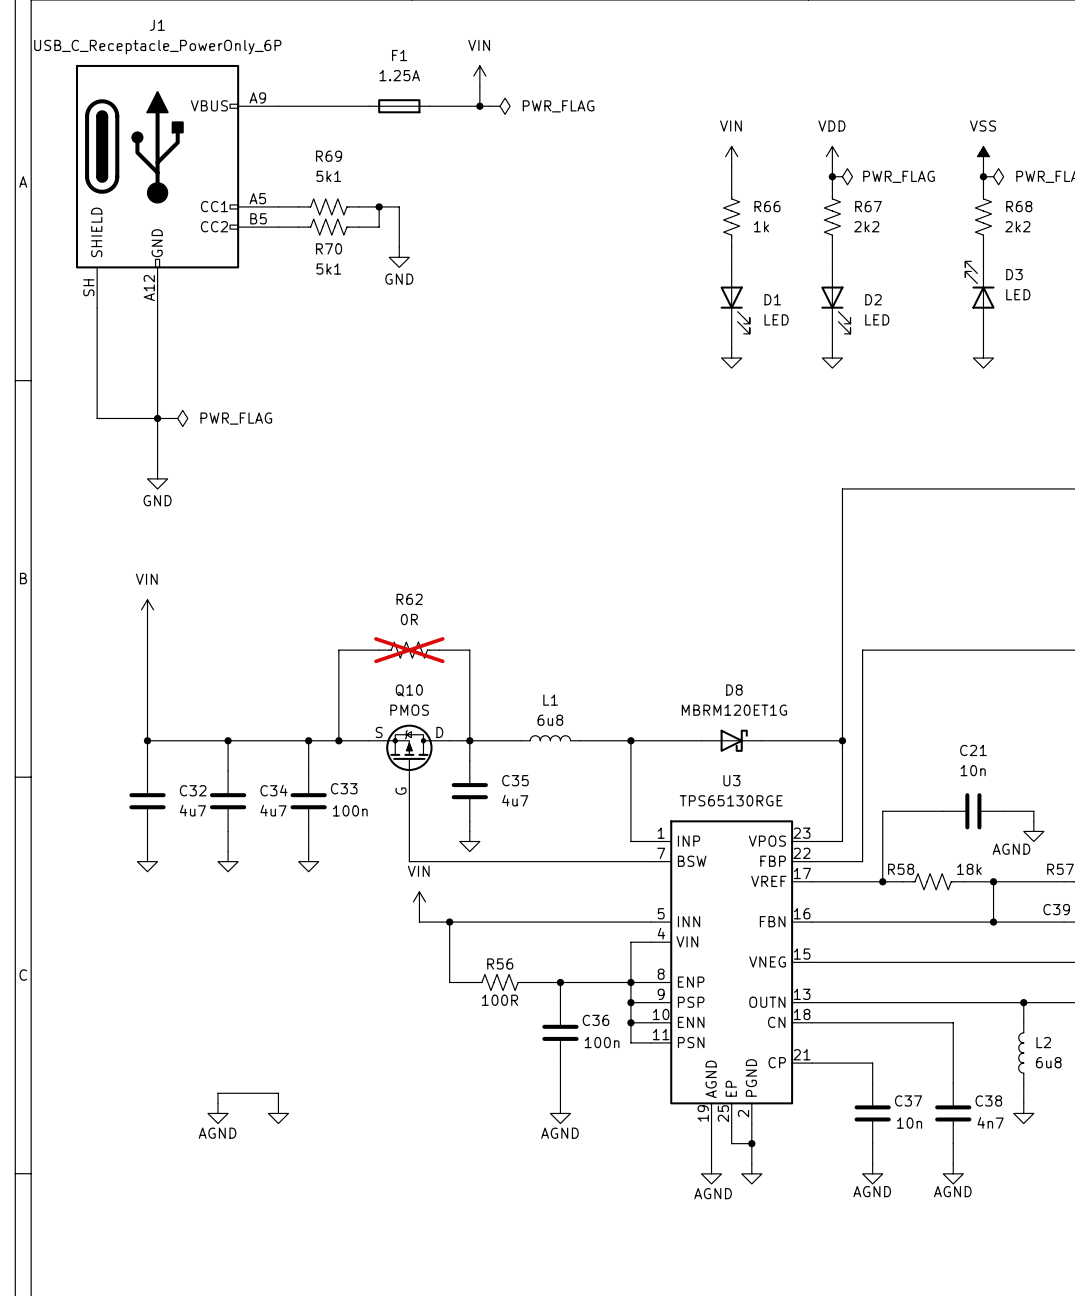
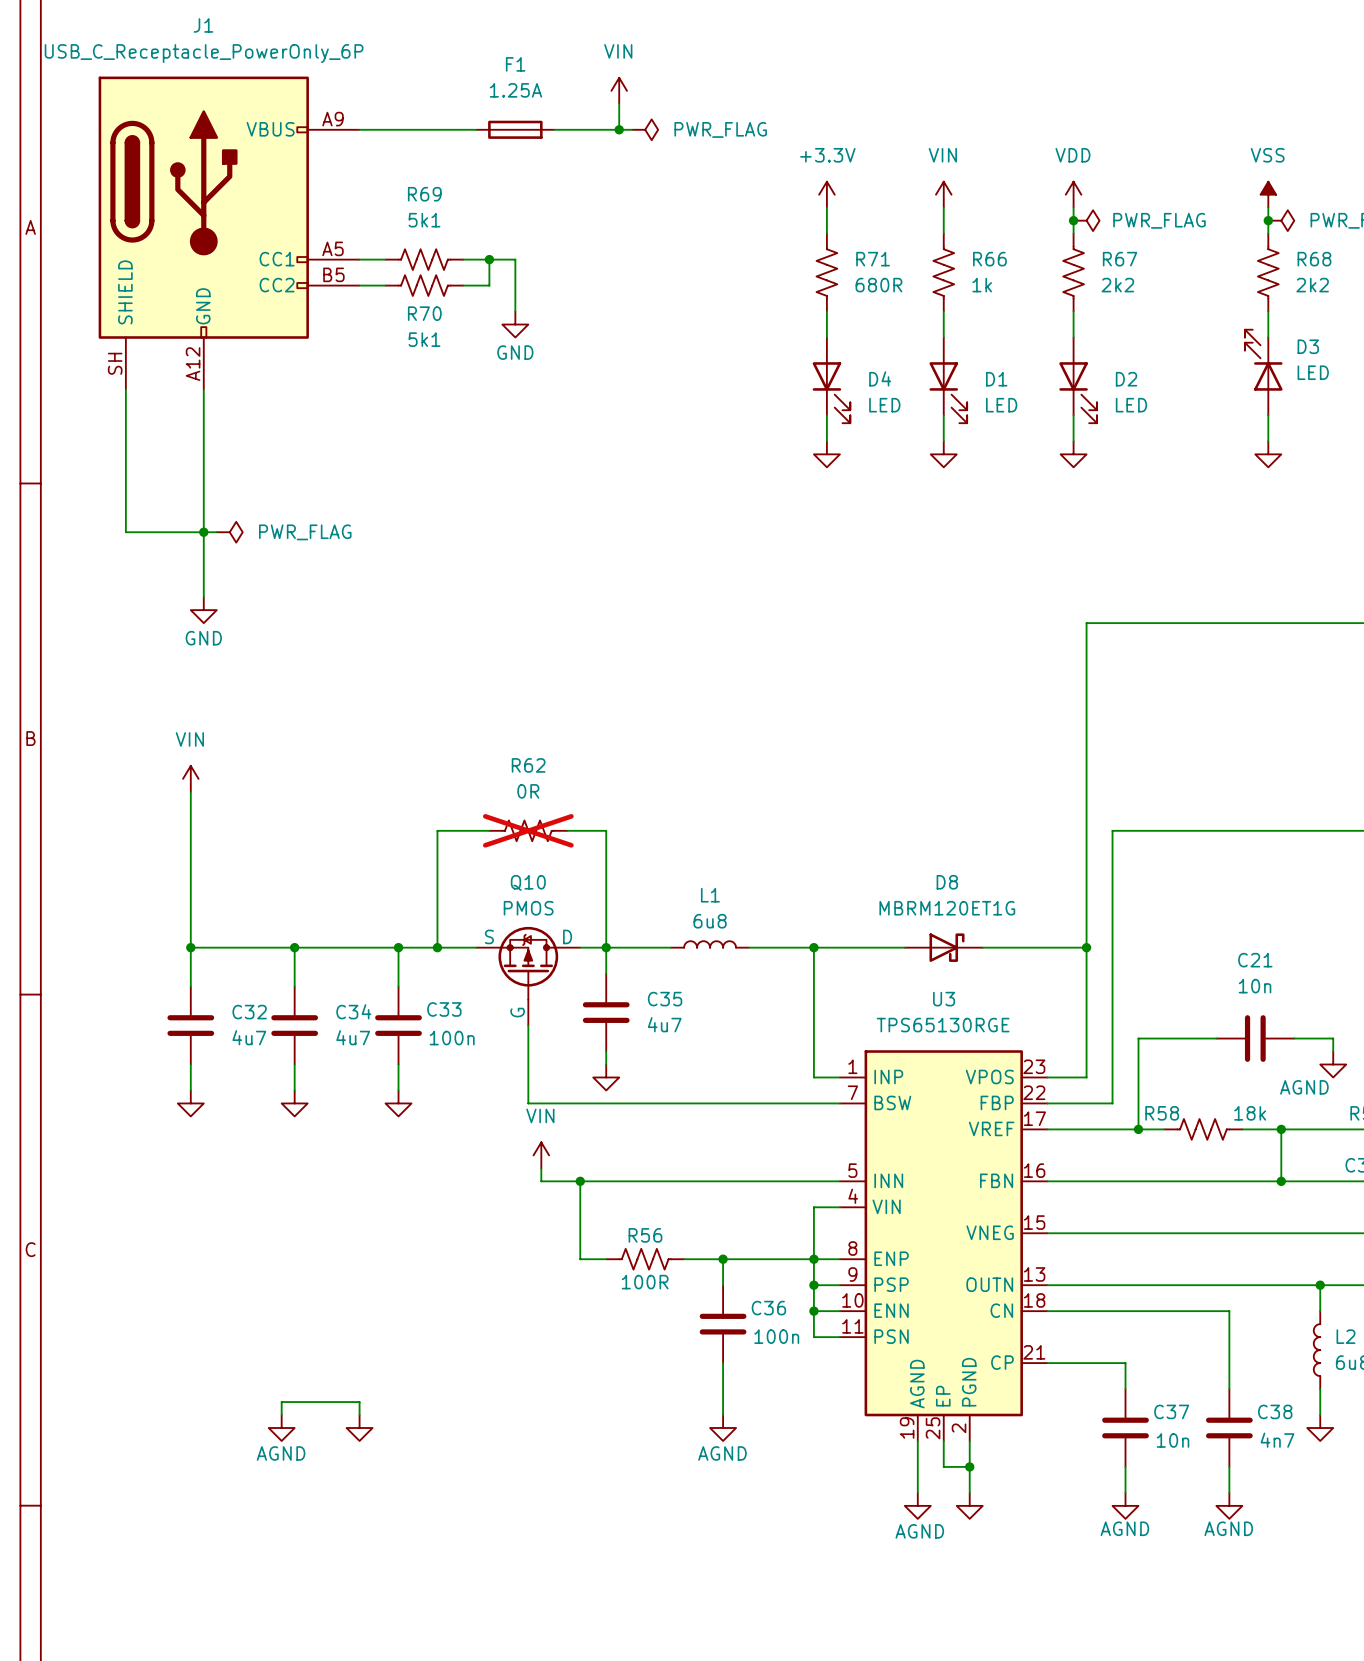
power symbol: none -> +3.3V (826, 194)
wire: none -> (826, 207) (826, 233)
R71: none -> 680R (826, 272)
wire: none -> (826, 311) (826, 337)
D4: none -> LED (831, 380)
wire: none -> (826, 415) (826, 441)
power symbol: none -> (826, 454)

